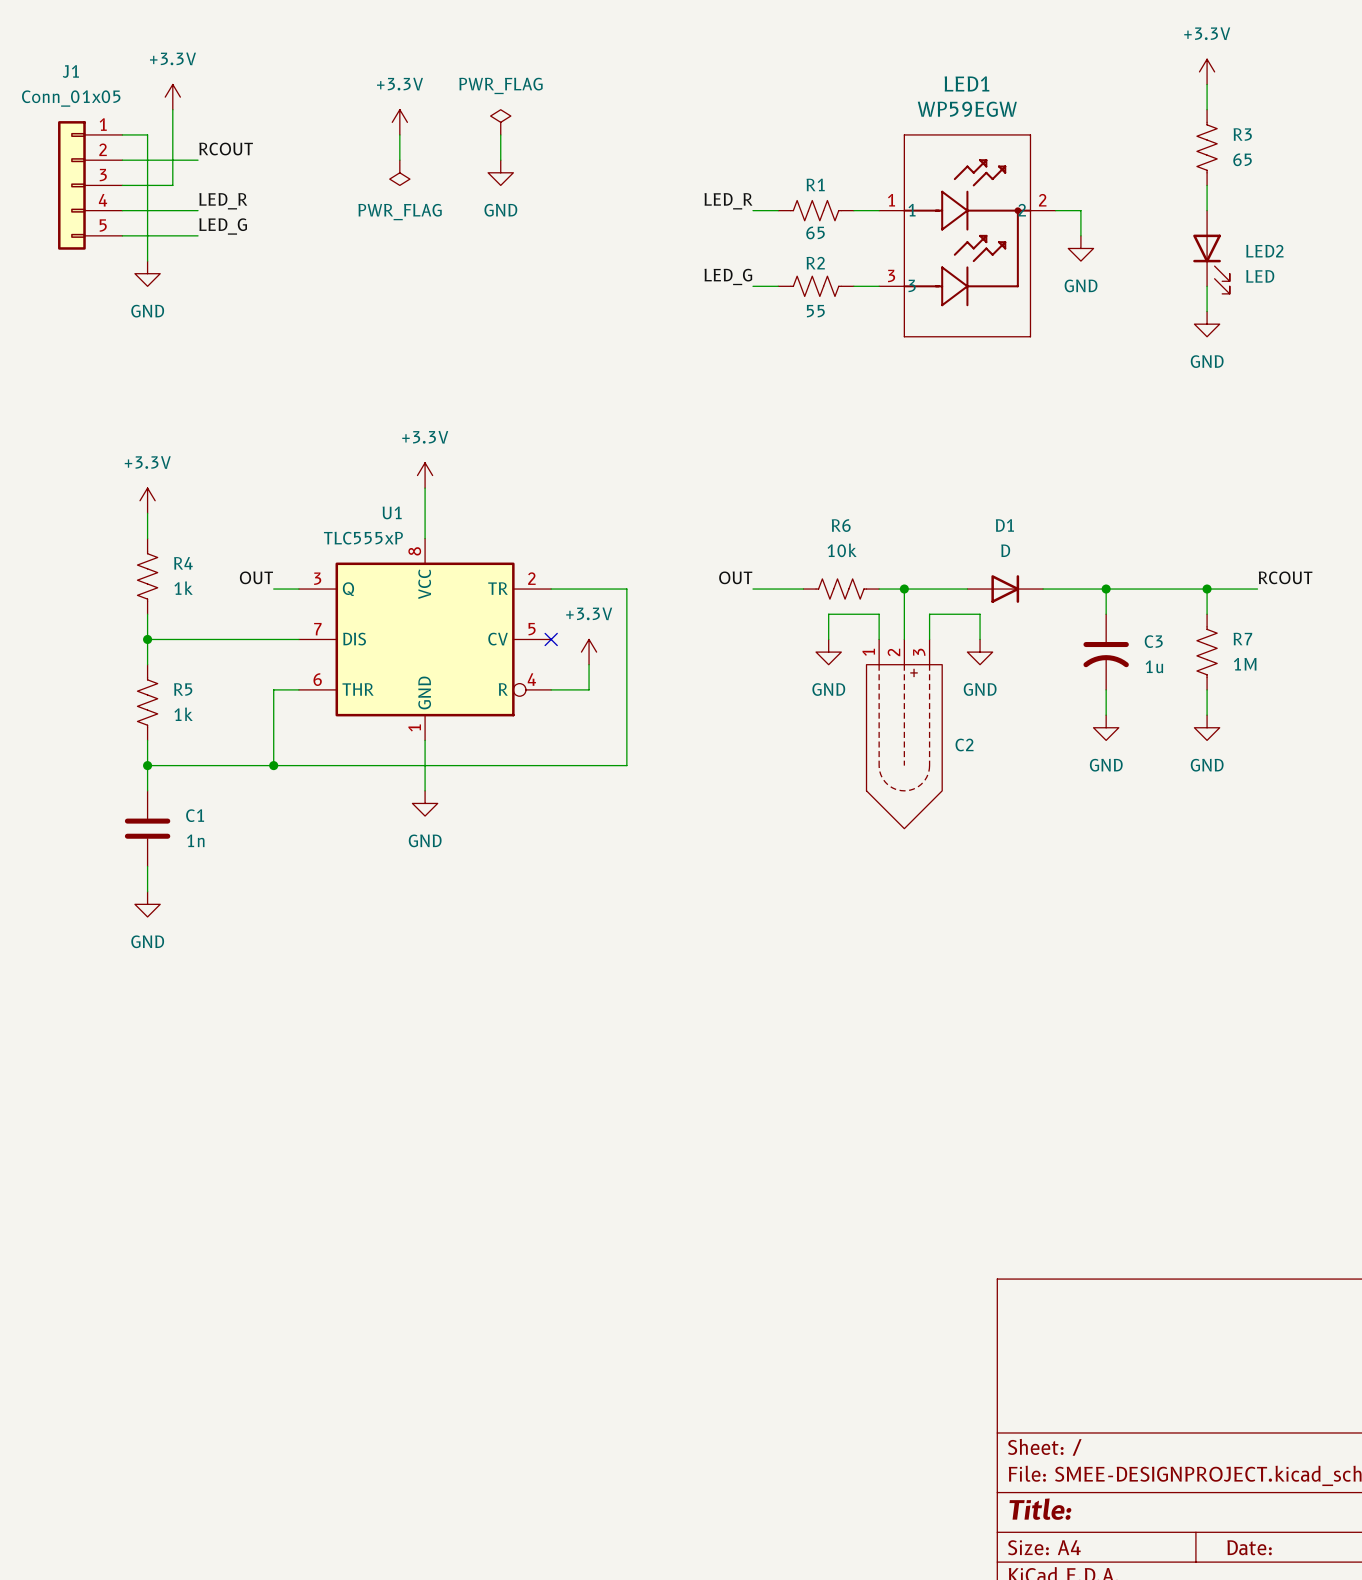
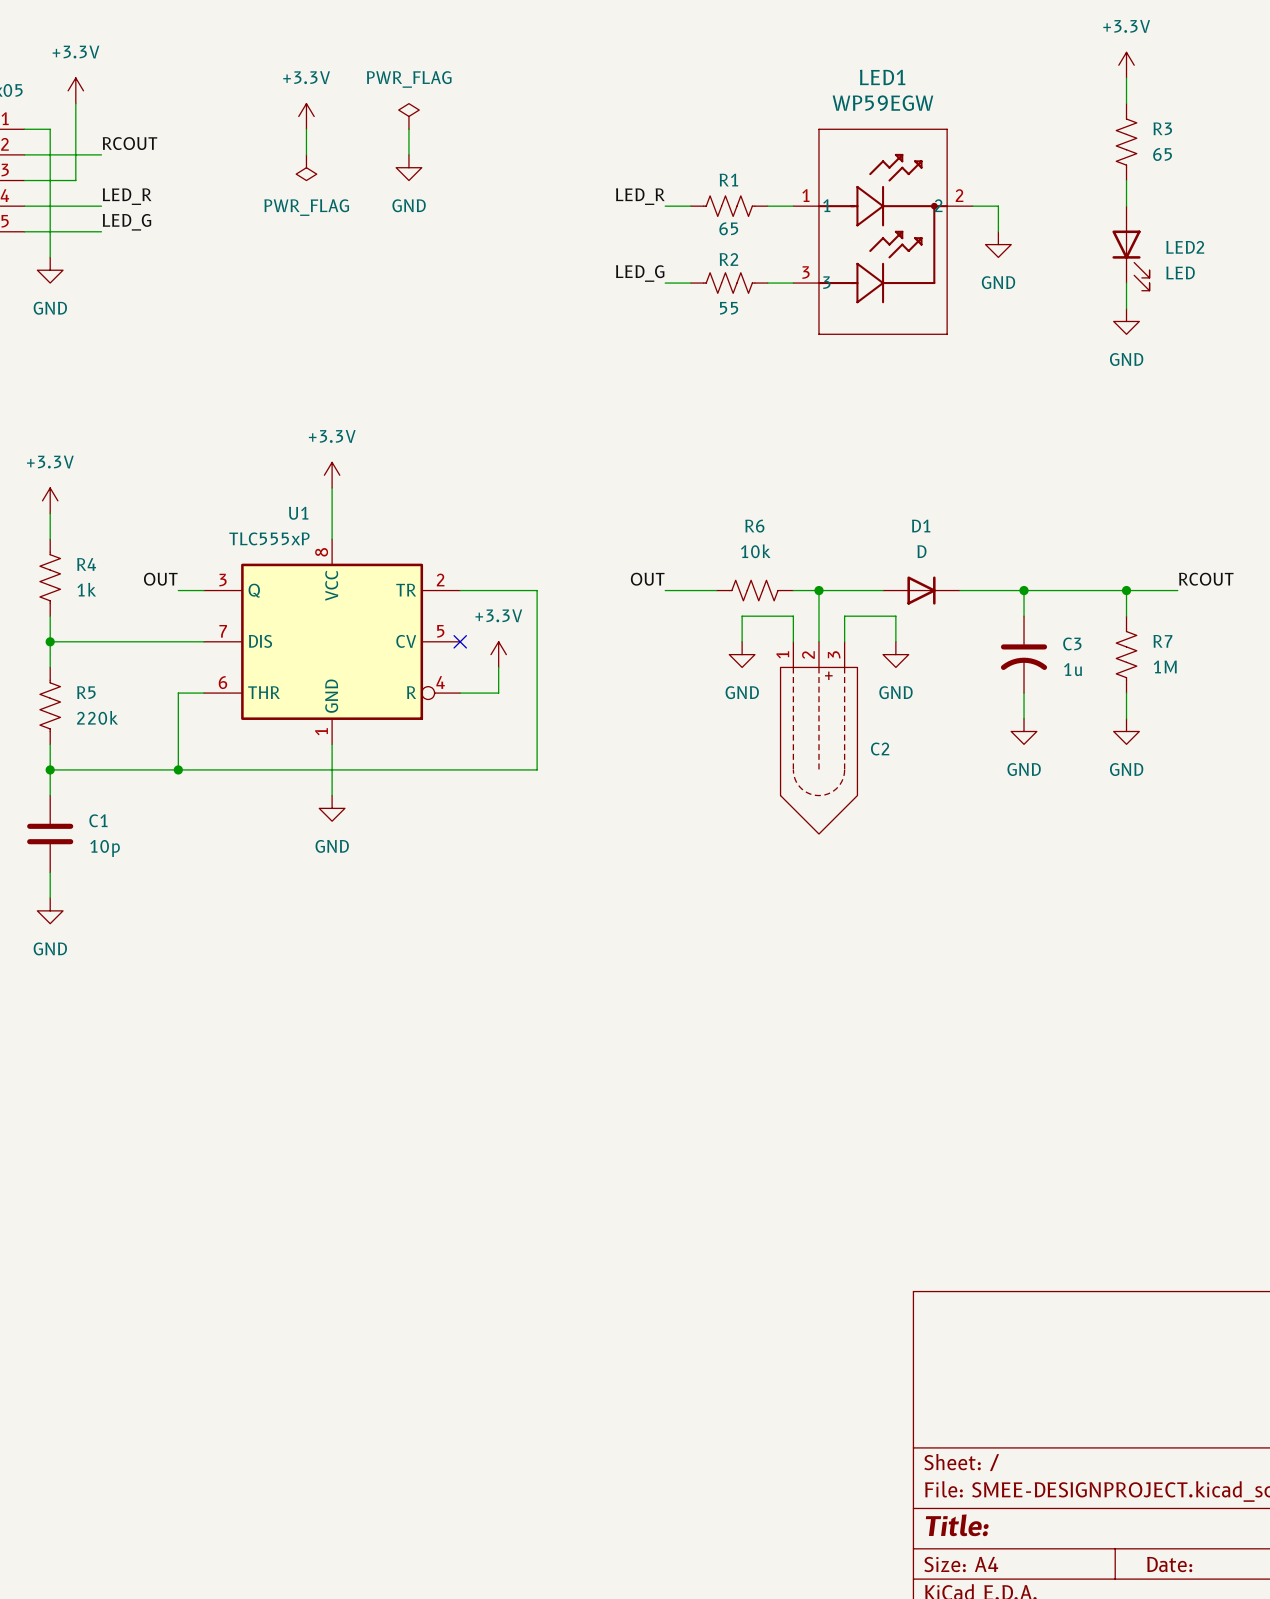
R5 value: 1k (183, 714) -> 220k (97, 717)
C1 value: 1n (195, 840) -> 10p (105, 848)

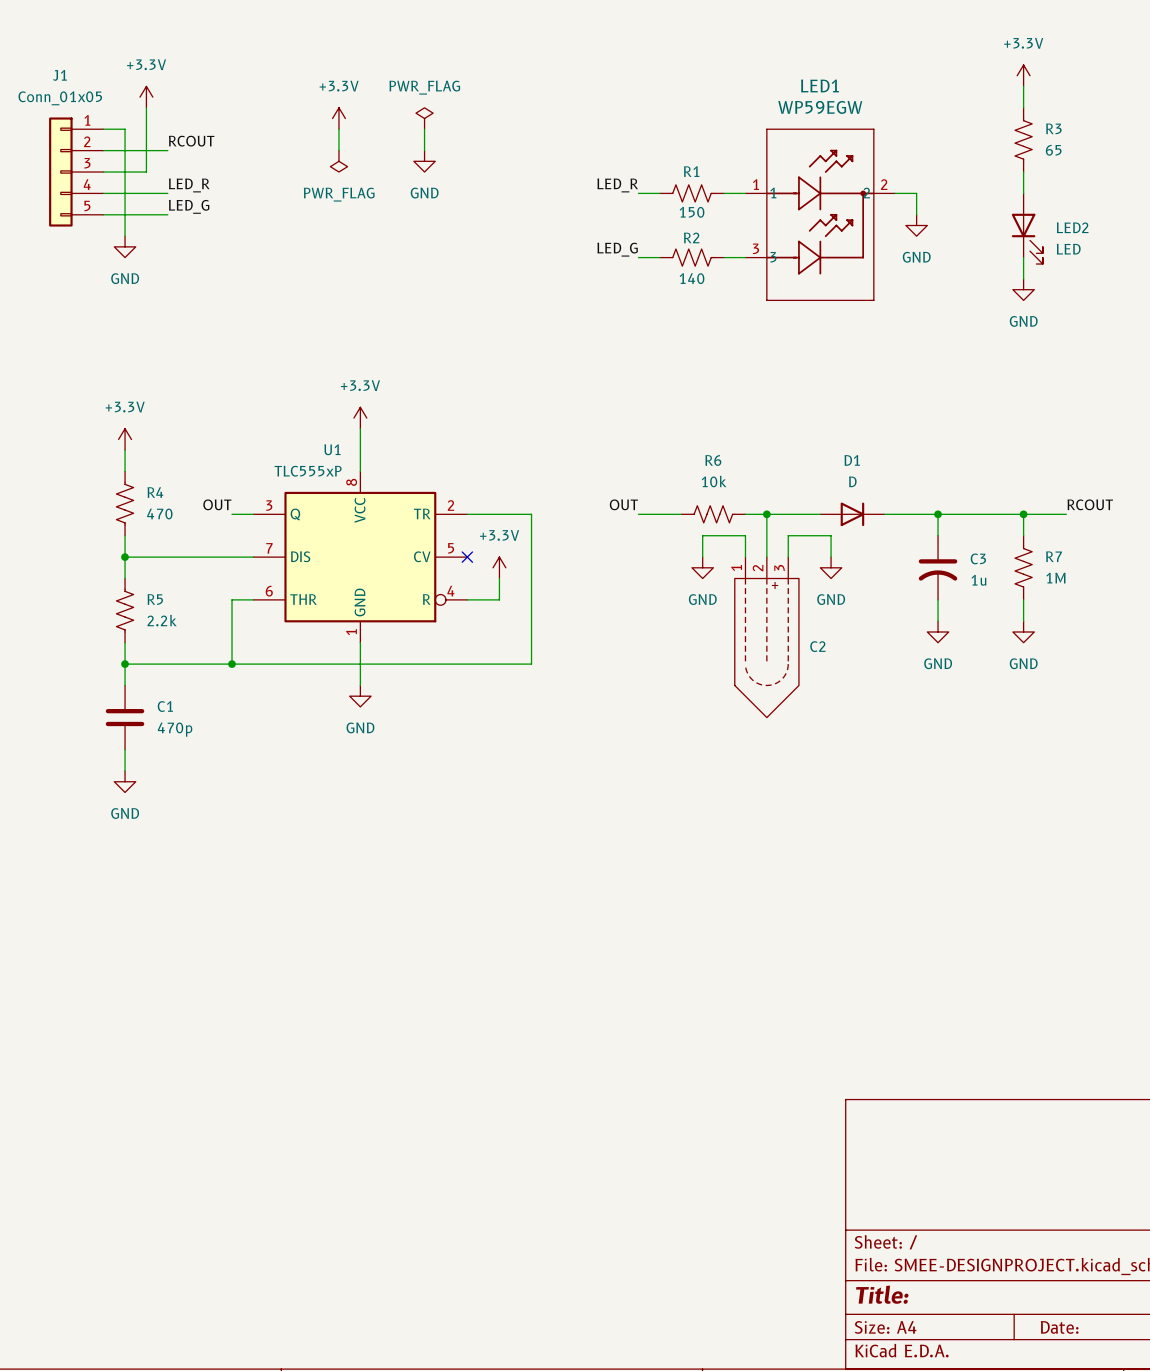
R1 value: 65 (728, 228) -> 150 (692, 212)
R2 value: 55 (729, 308) -> 140 (692, 278)
R4 value: 1k (86, 589) -> 470 (159, 513)
R5 value: 220k (97, 717) -> 2.2k (162, 620)
C1 value: 10p (105, 848) -> 470p (175, 729)

